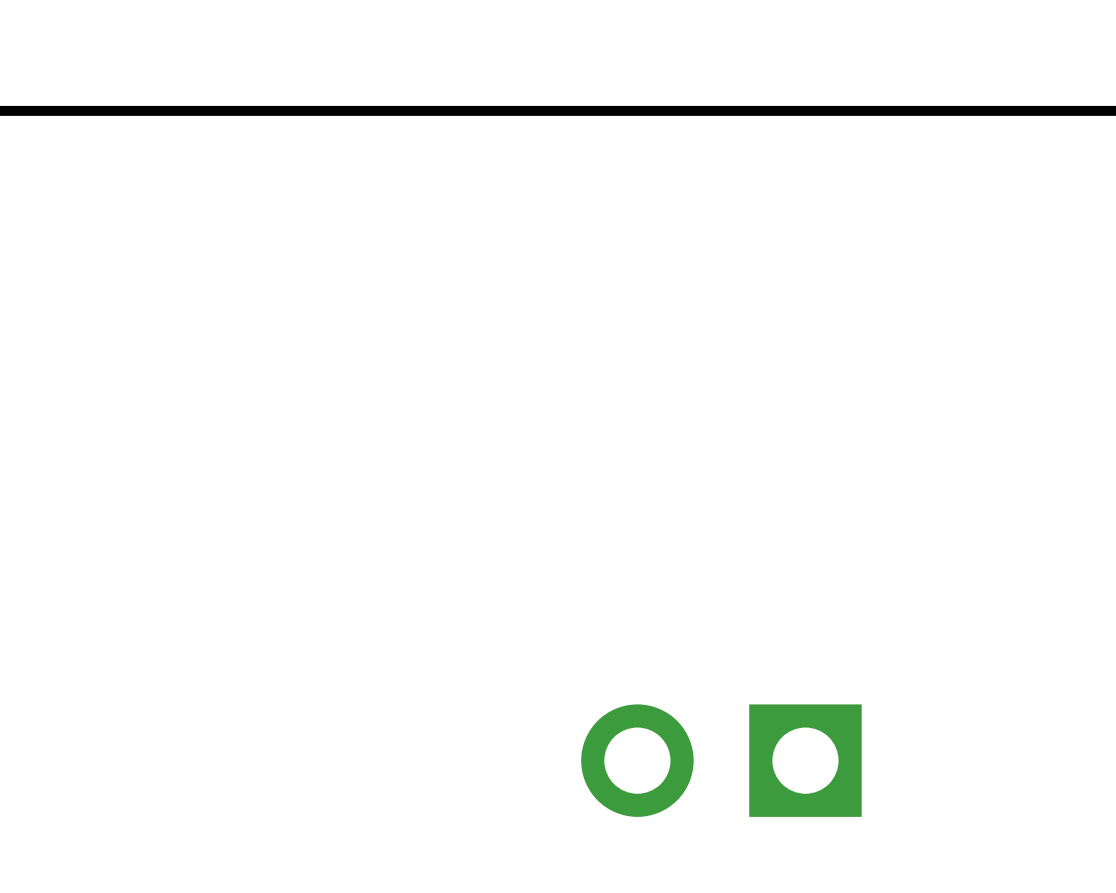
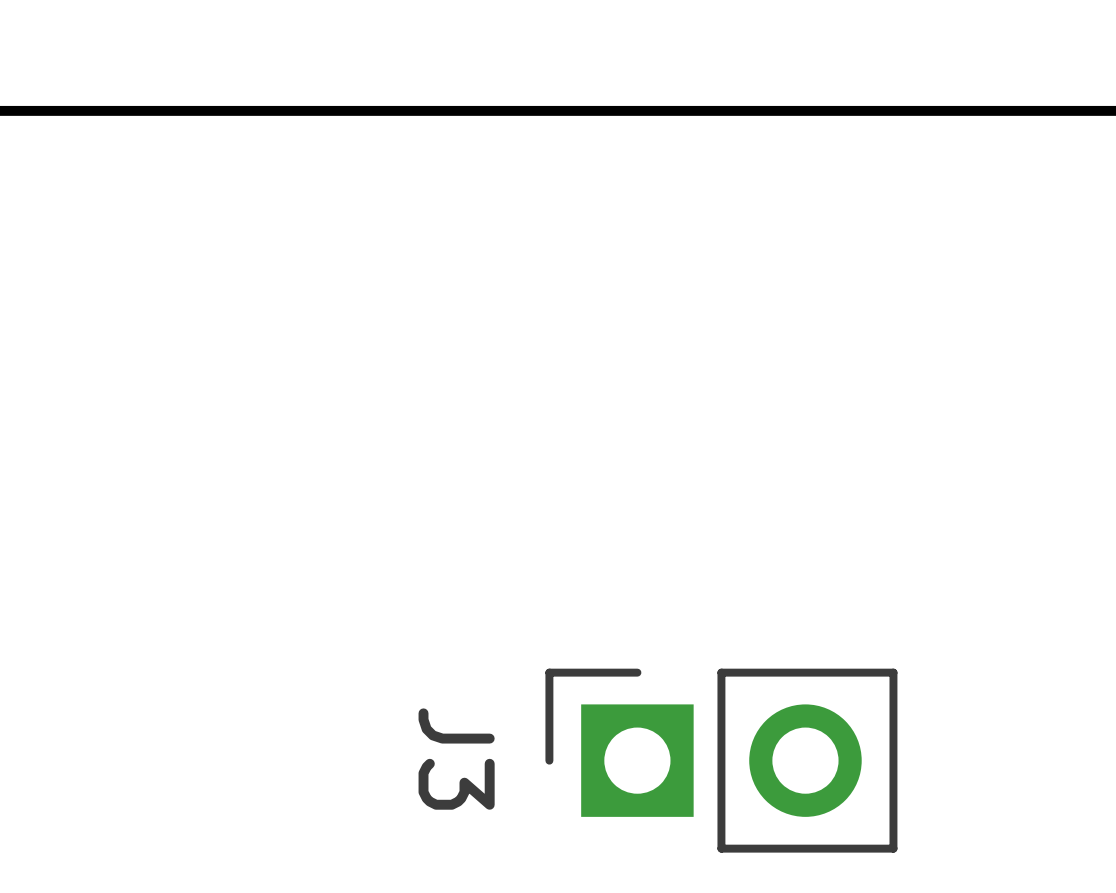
J3 side: top (721, 760) -> bottom (721, 760)

